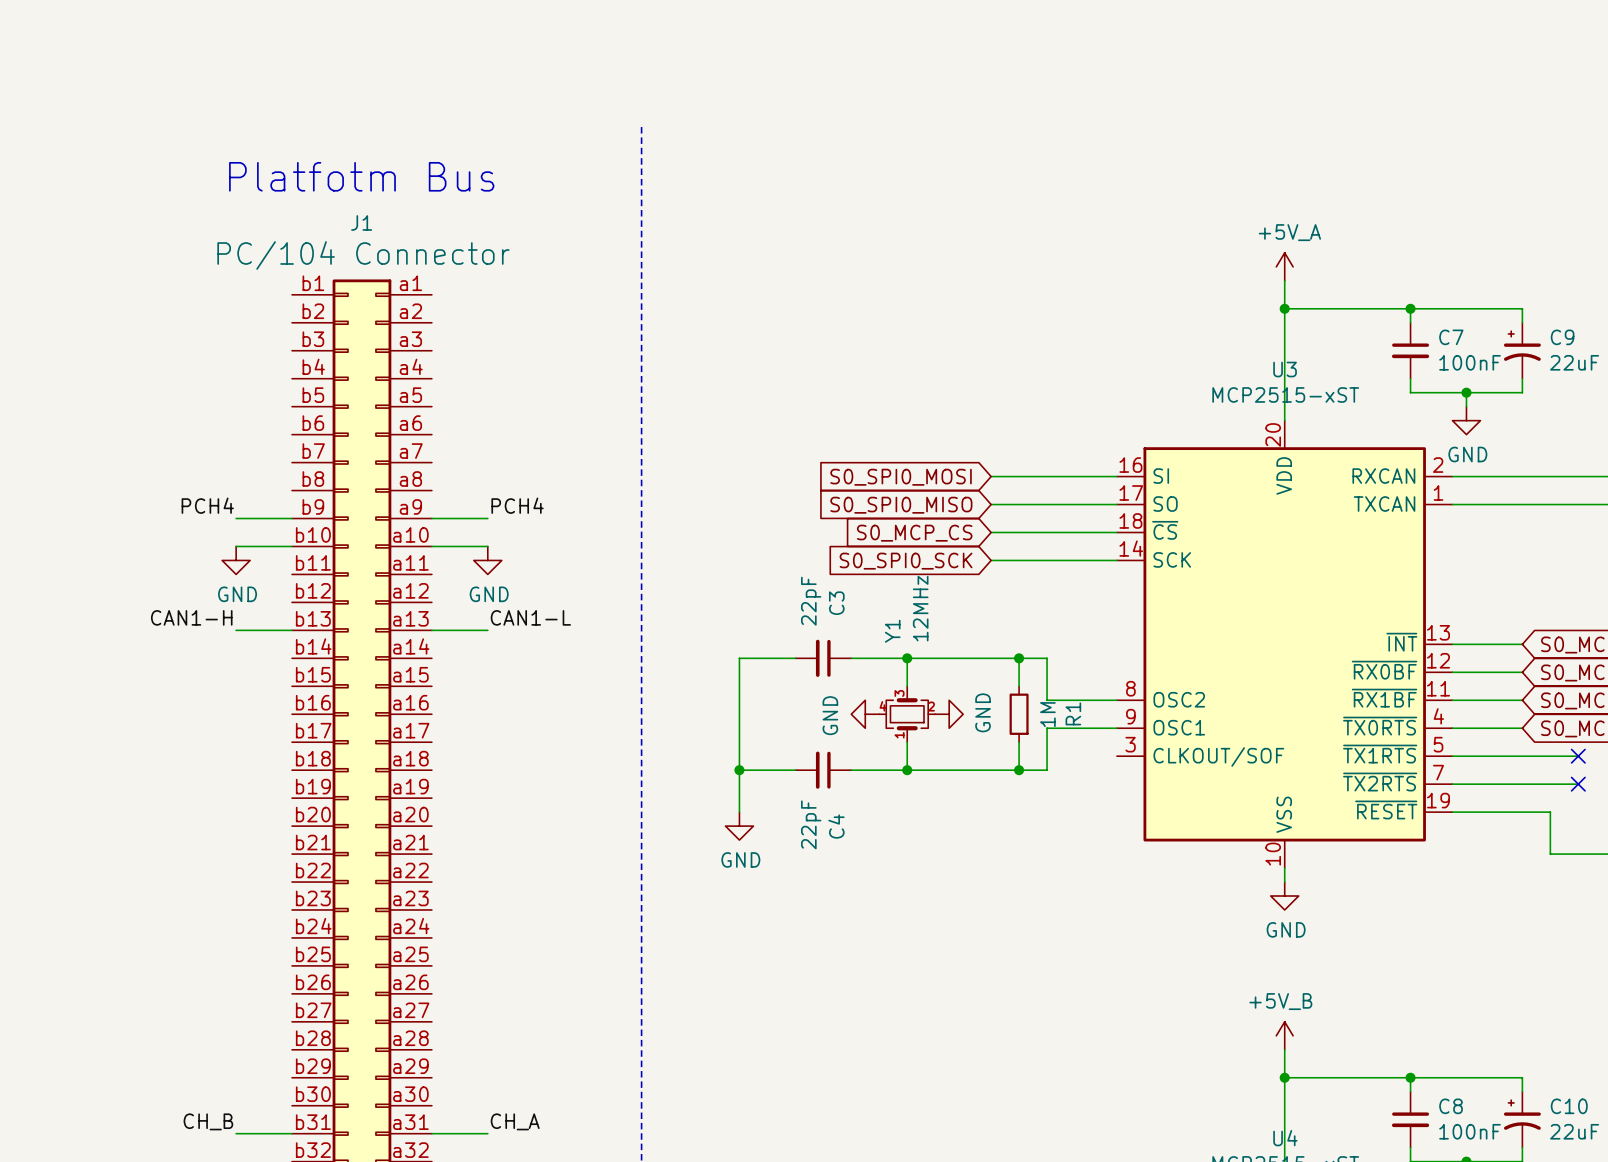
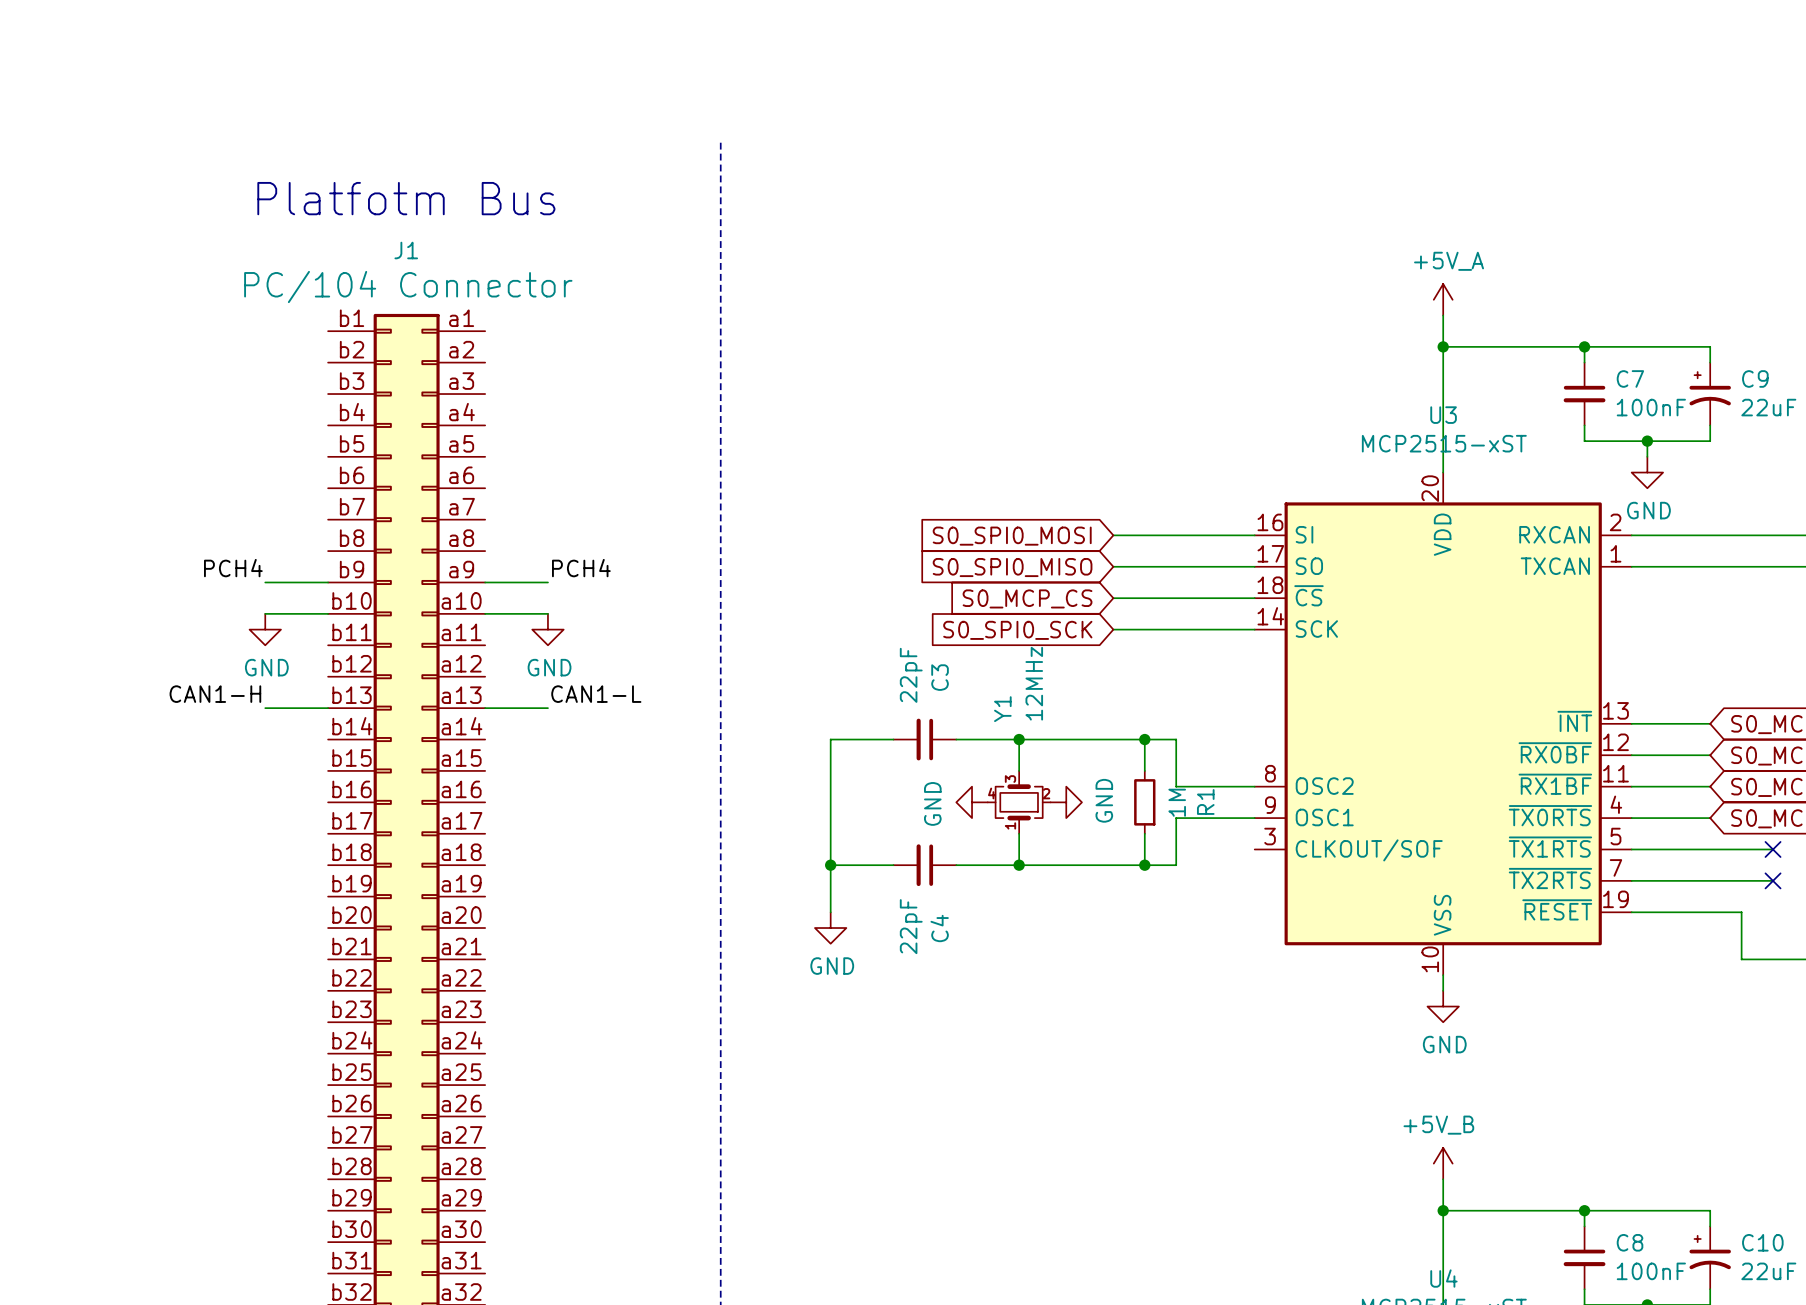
label: CH_B (208, 1121) -> none
label: CH_A (515, 1121) -> none
wire: (236, 1133) (292, 1133) -> none
wire: (431, 1133) (487, 1133) -> none

